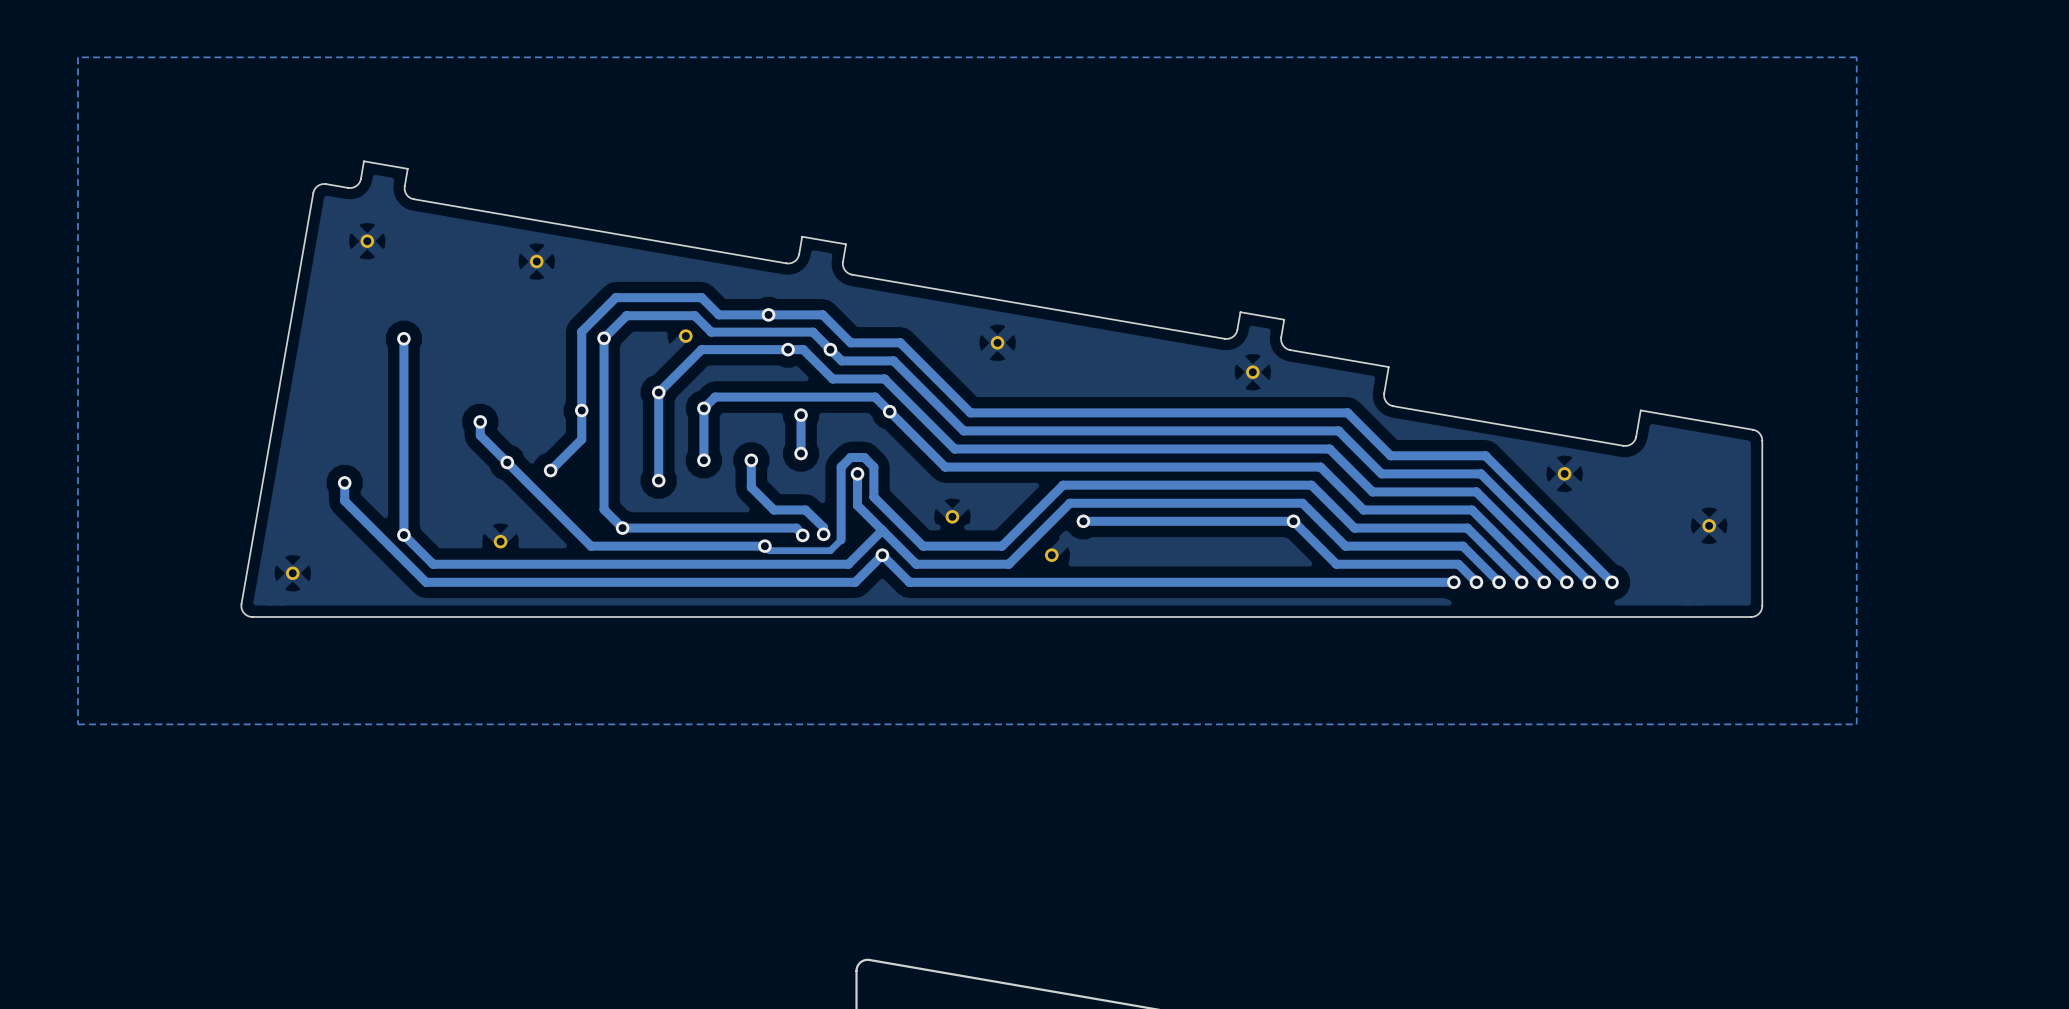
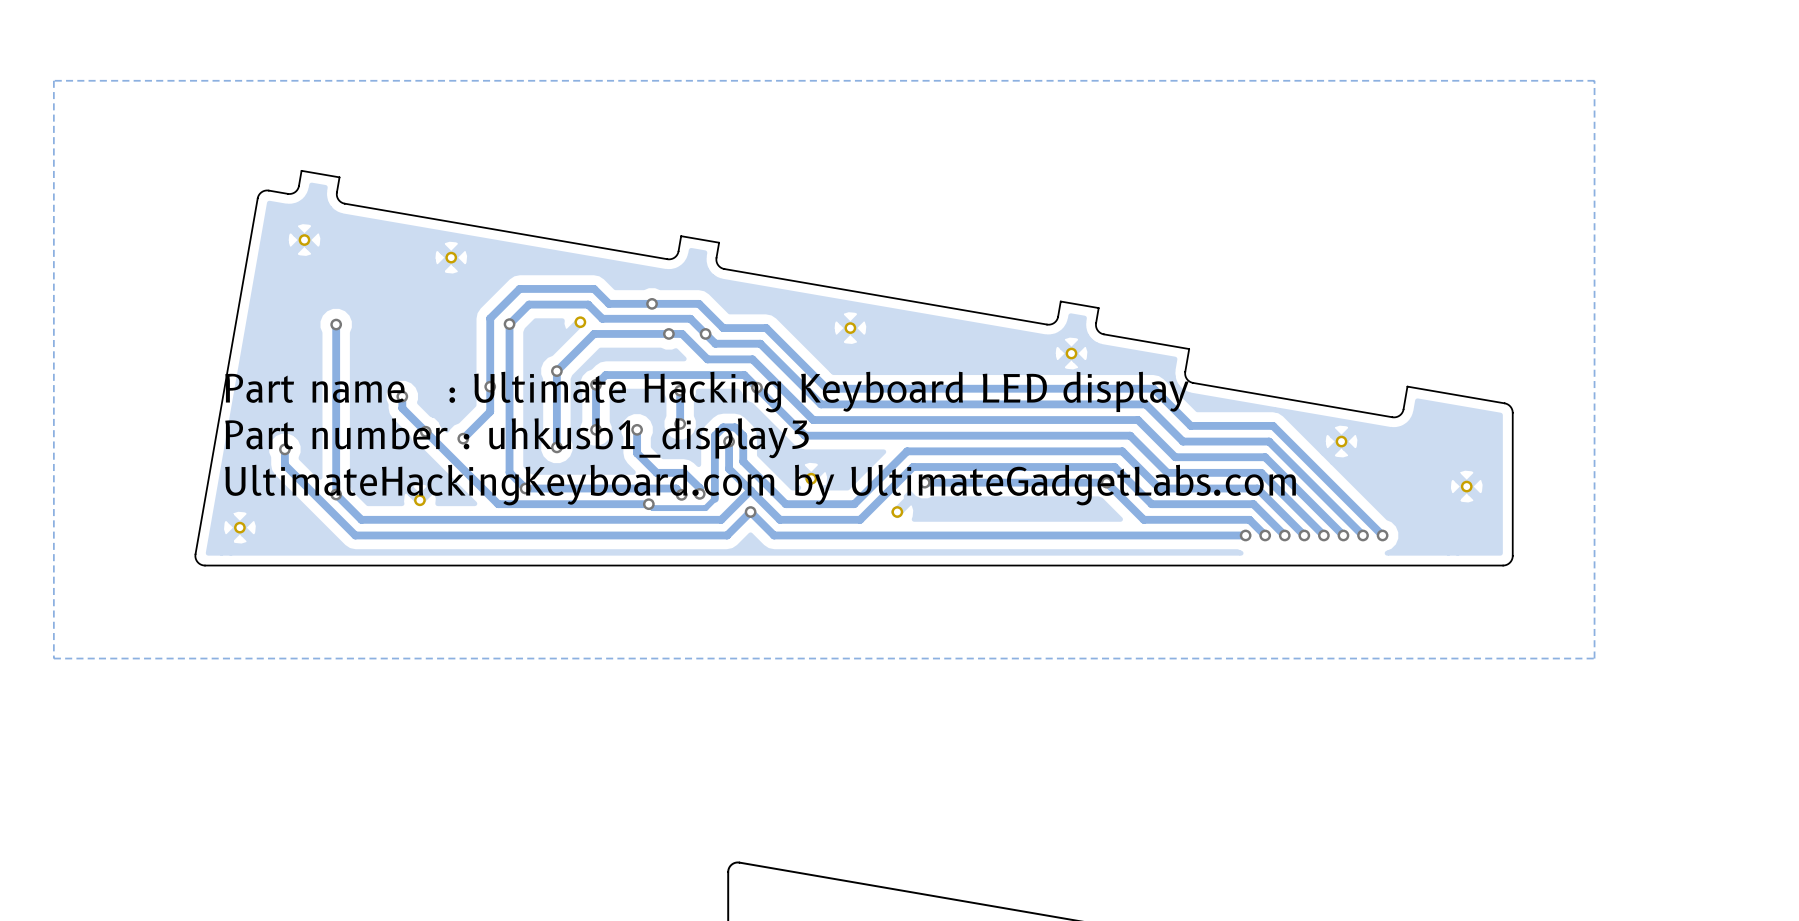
text: none -> Part name : Ultimate Hacking Keyboard LED display (706, 392)
text: none -> Part number : uhkusb1_display3 (517, 438)
text: none -> UltimateHackingKeyboard.com by UltimateGadgetLabs.com (760, 485)

